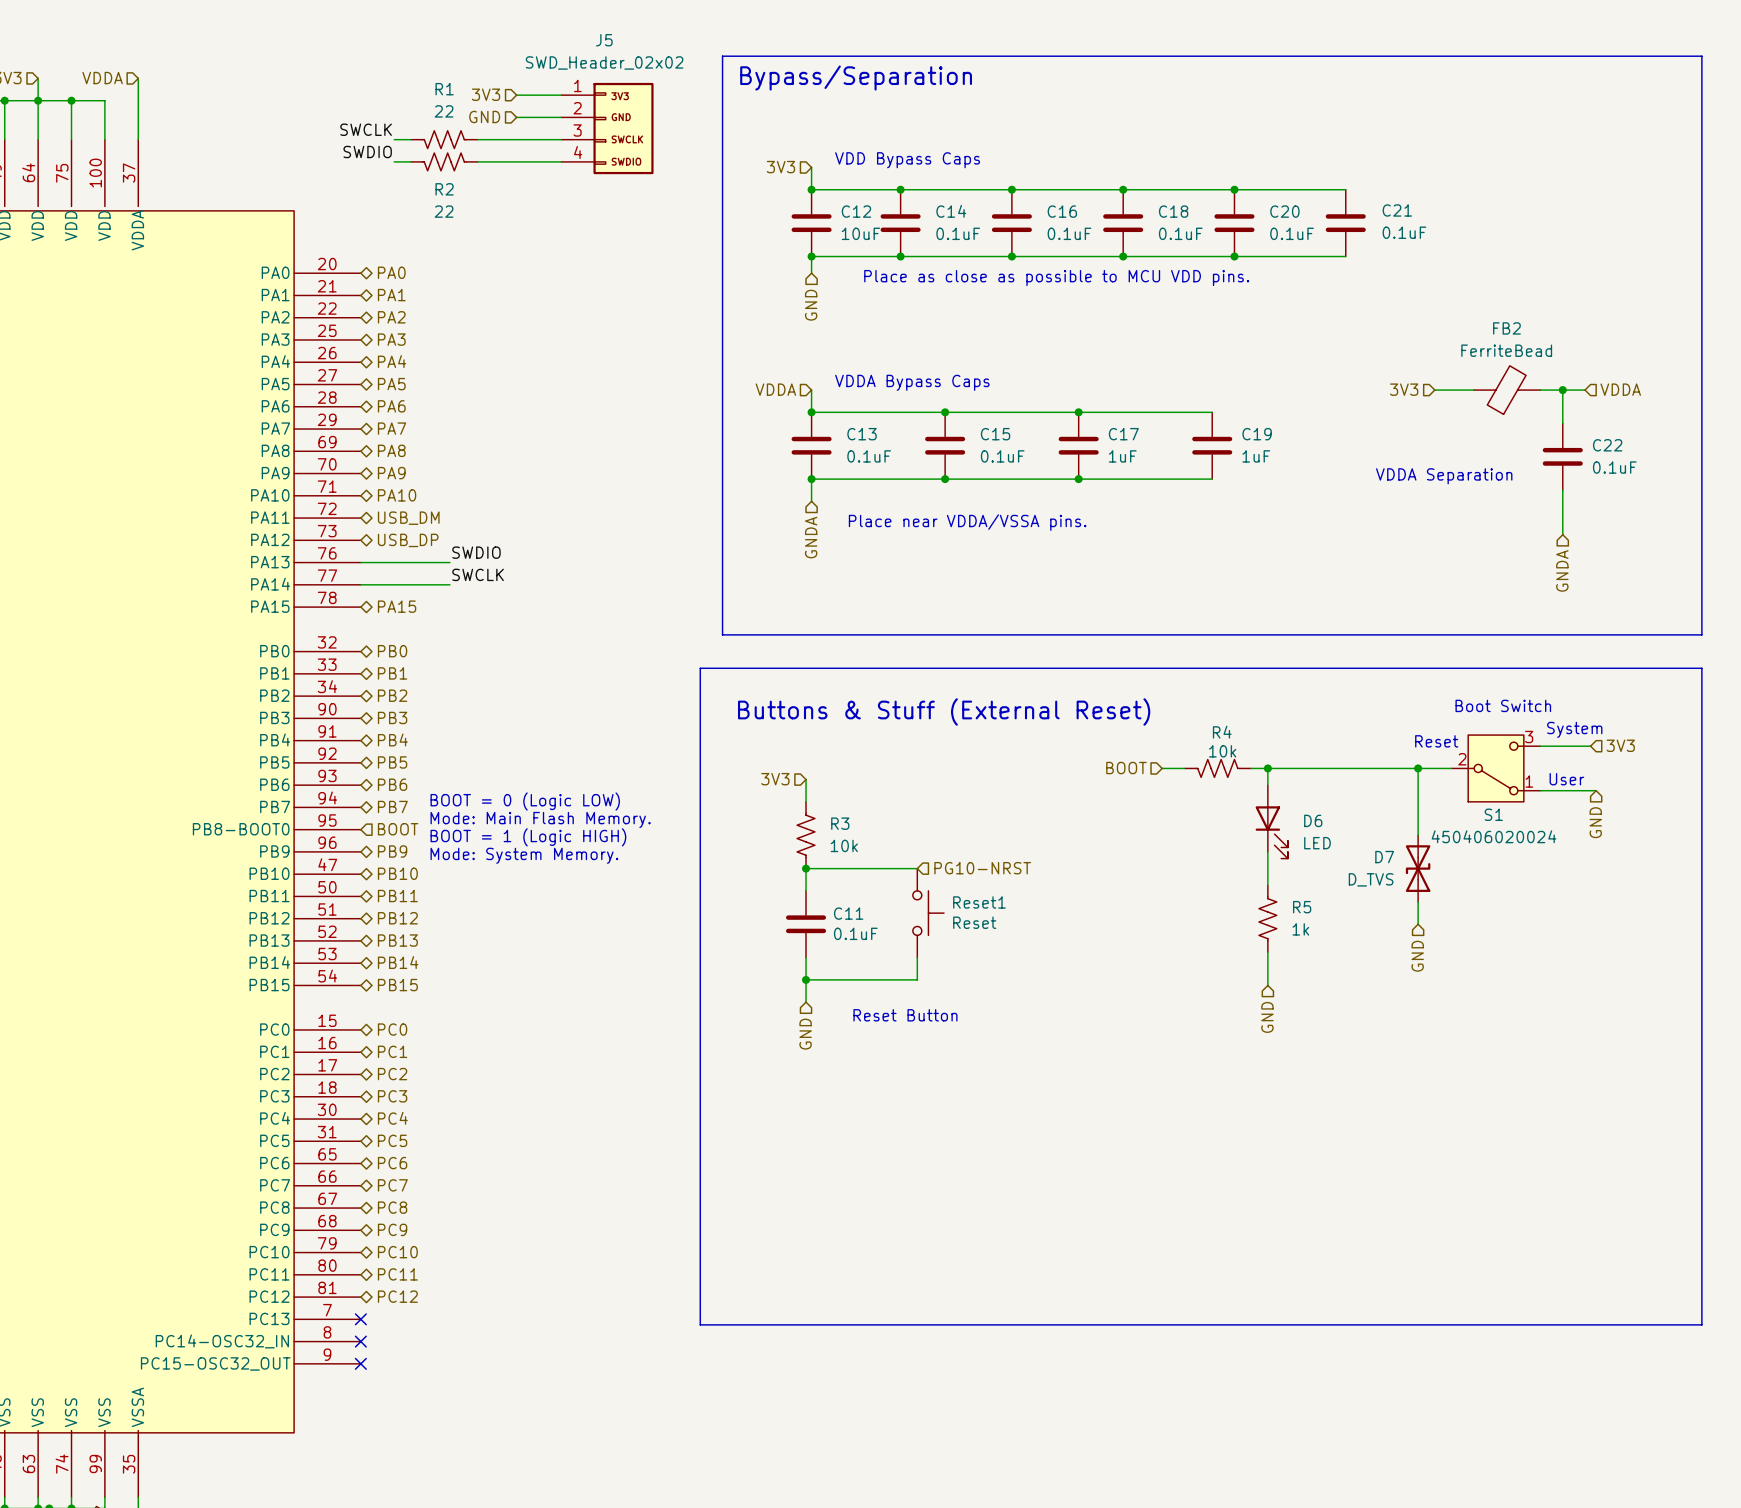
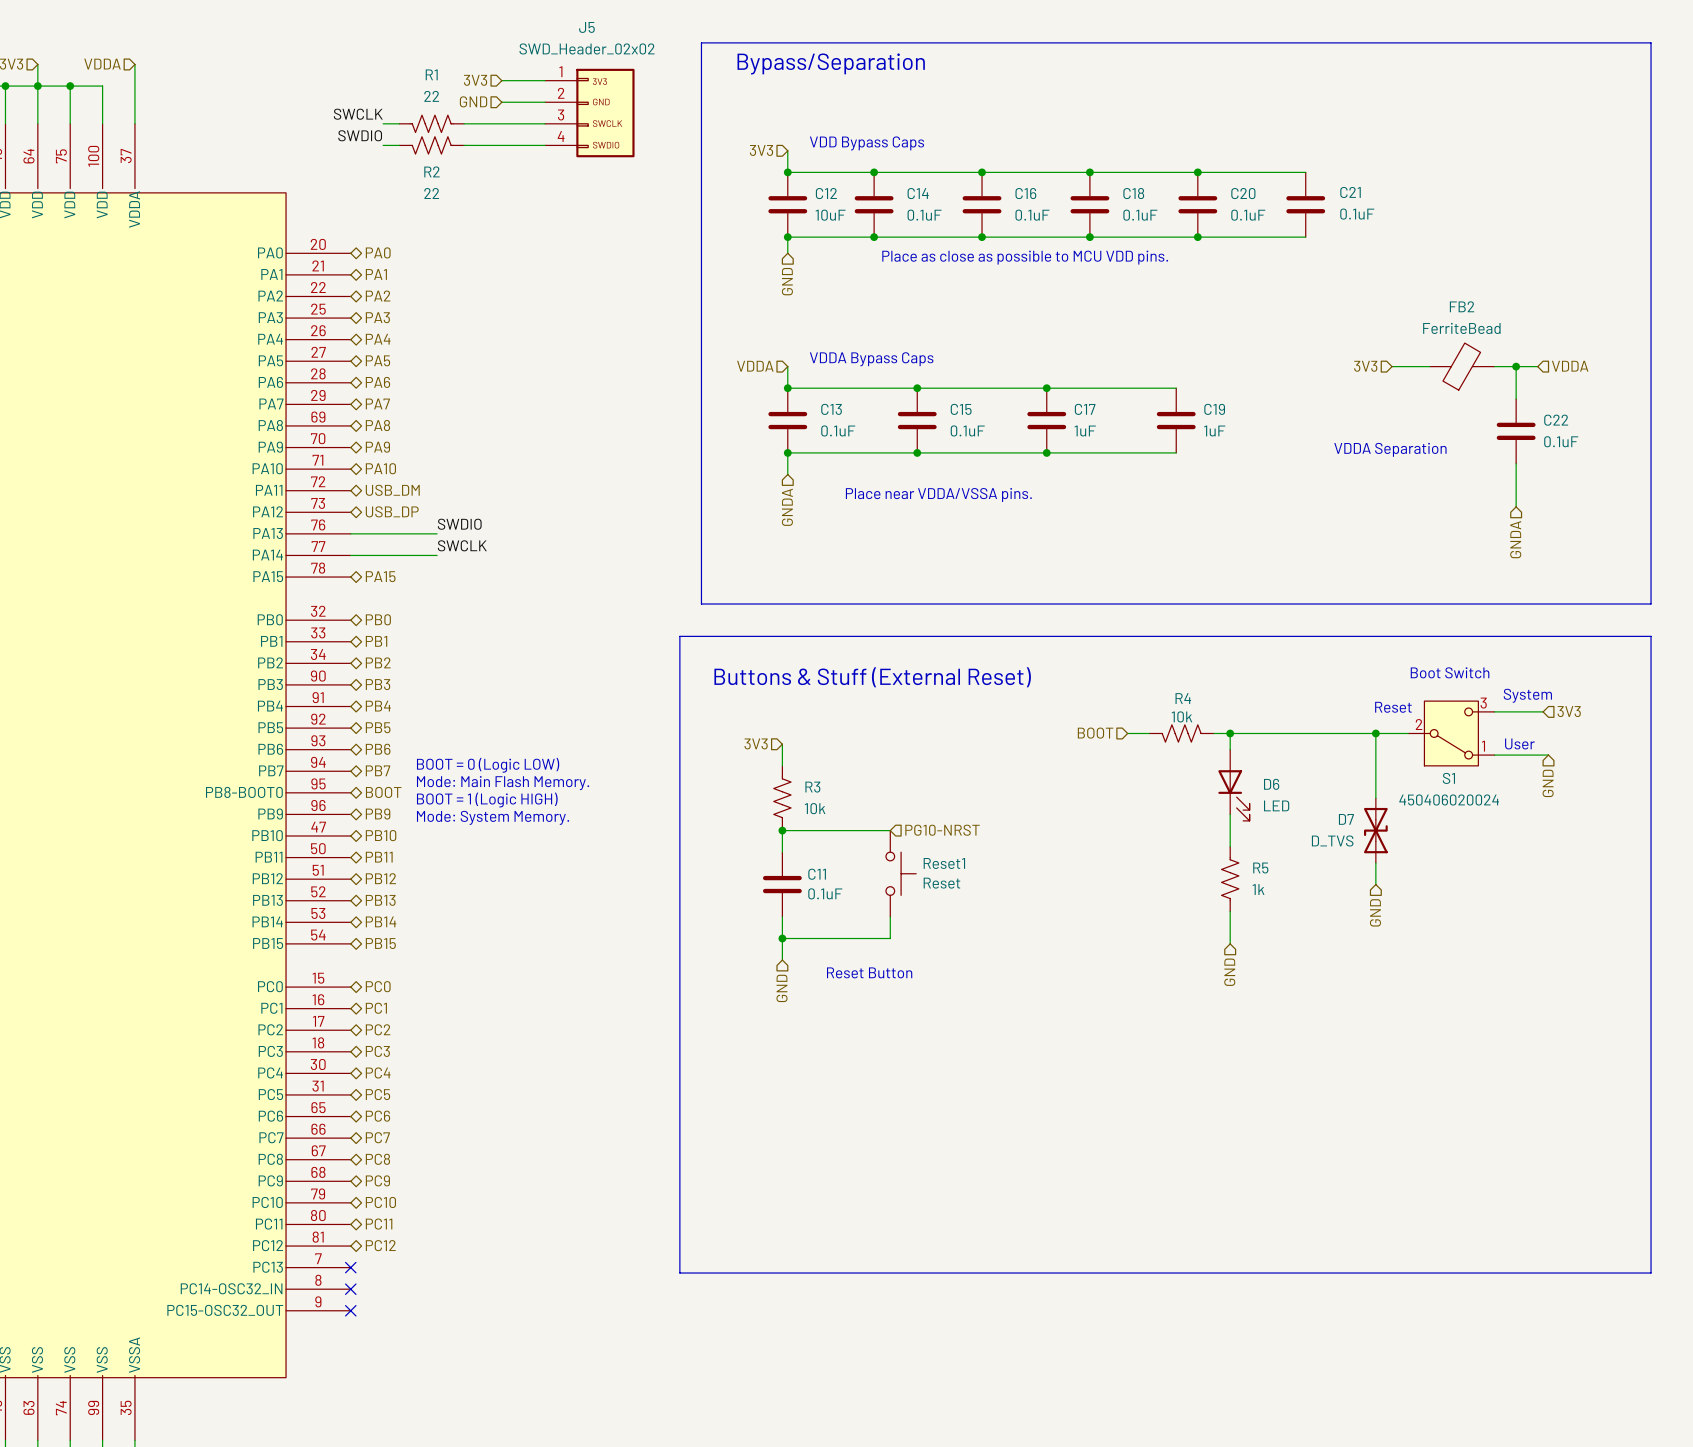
hierarchical label shape: input (398, 829) -> bidirectional (383, 792)

